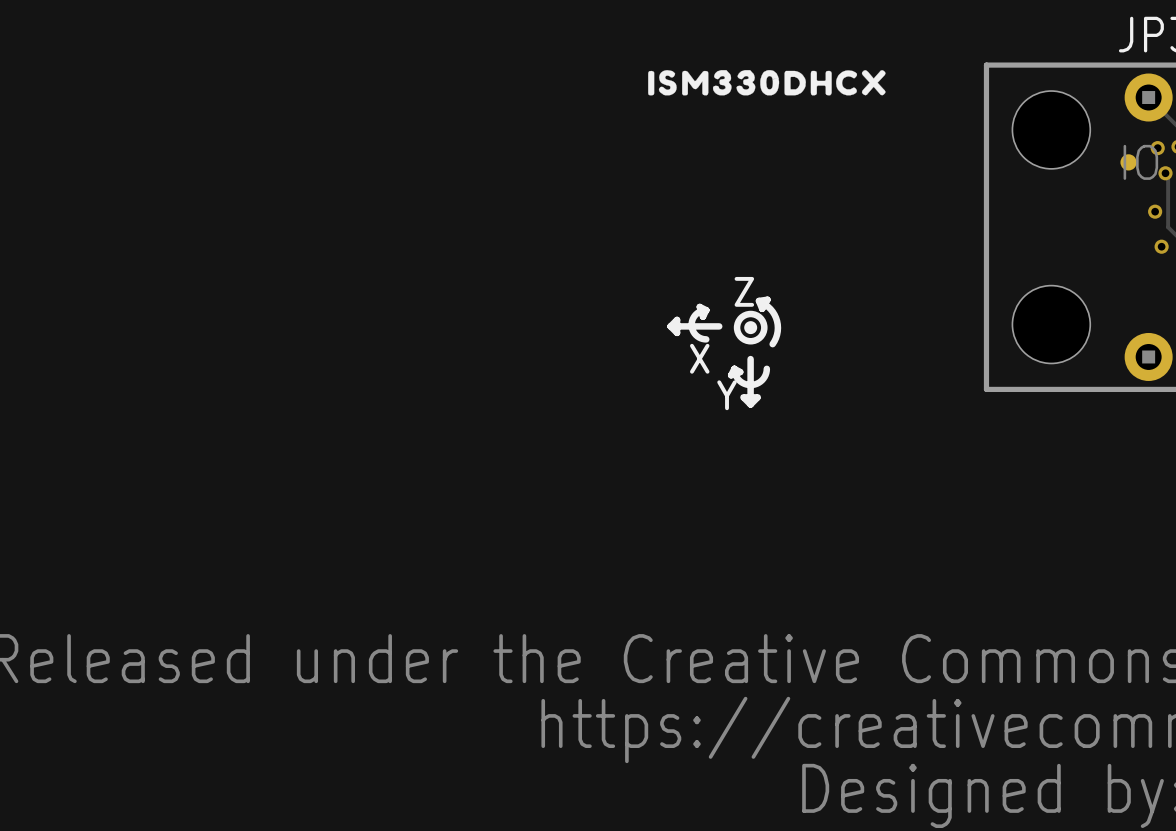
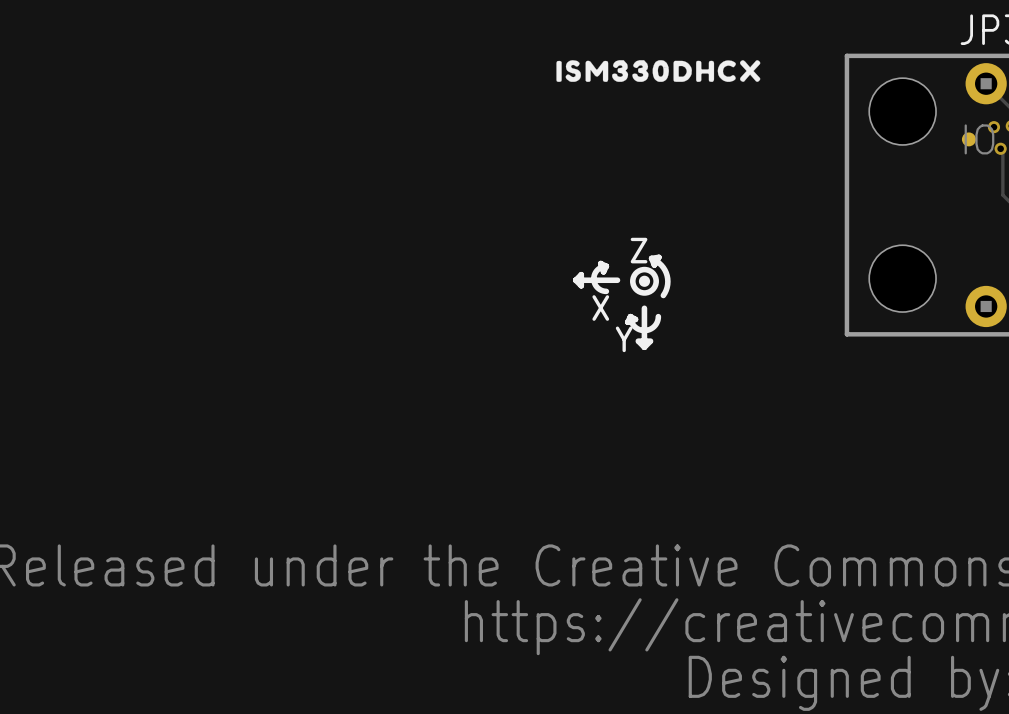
via: (1155, 211) -> none
via: (1161, 246) -> none

